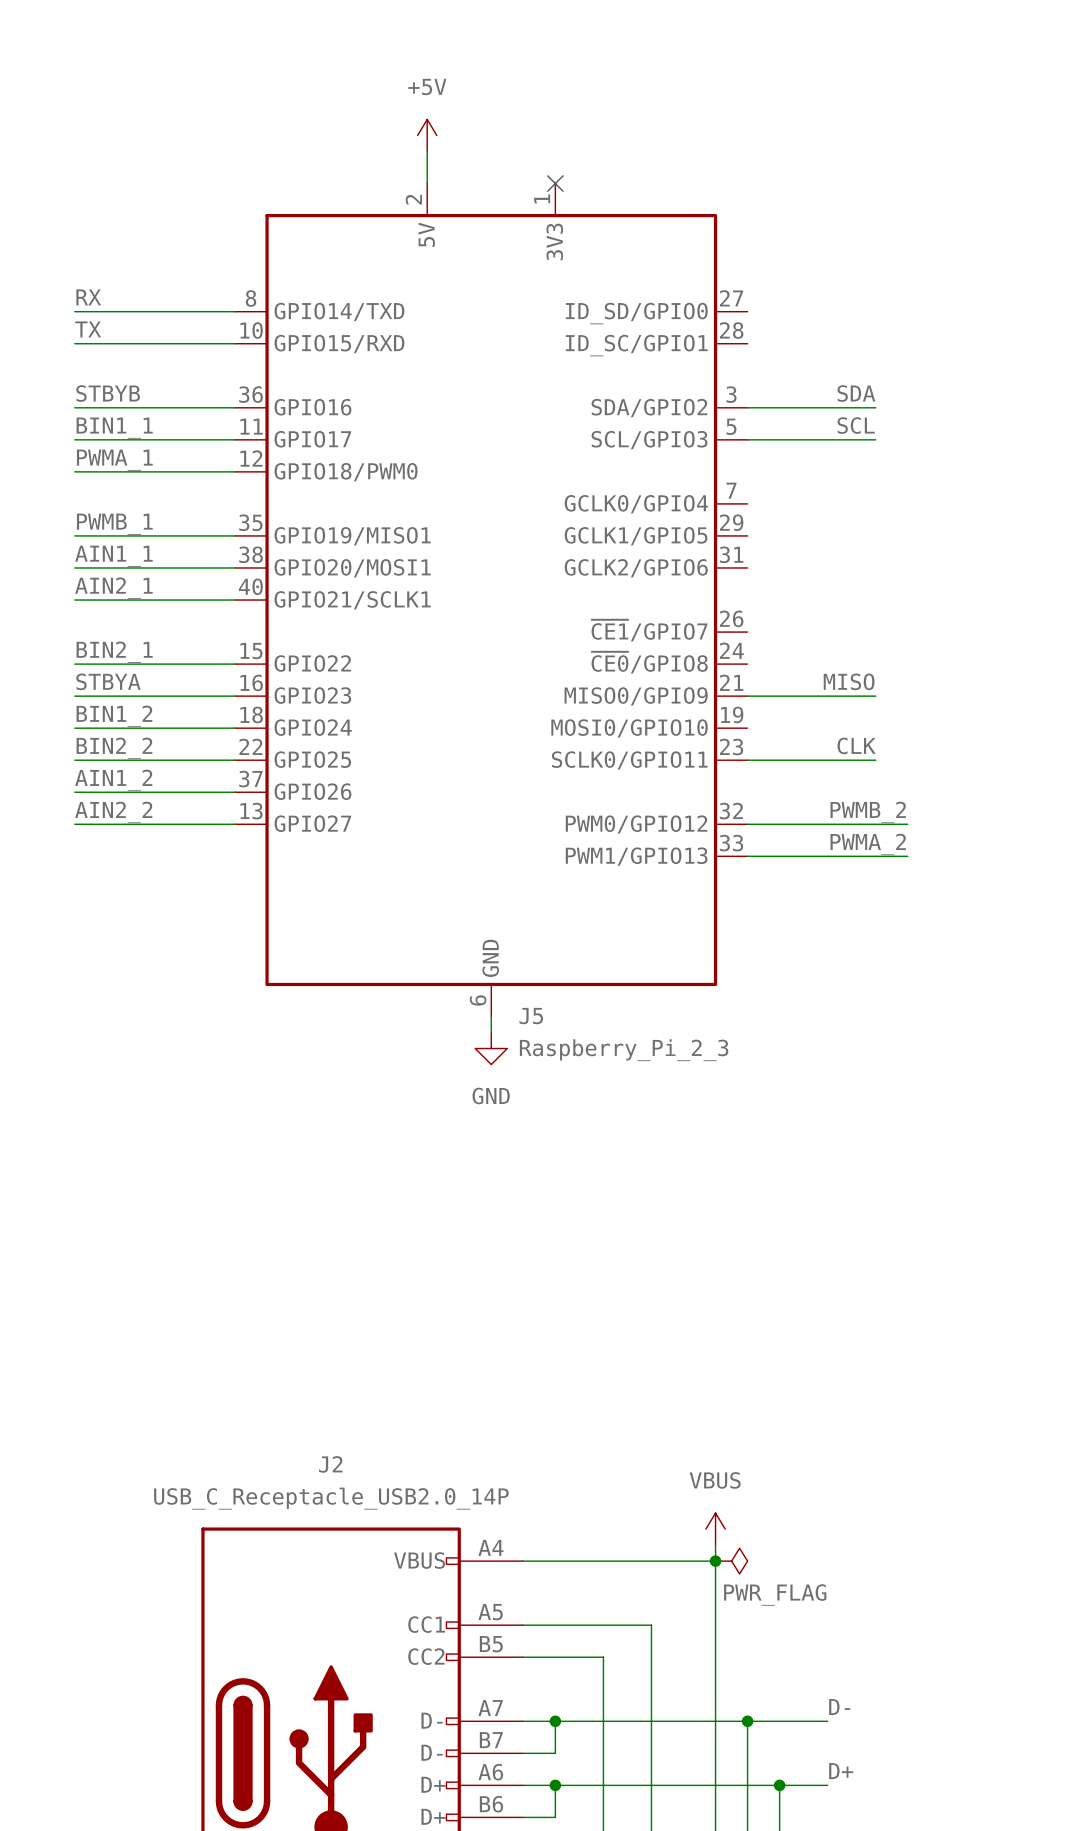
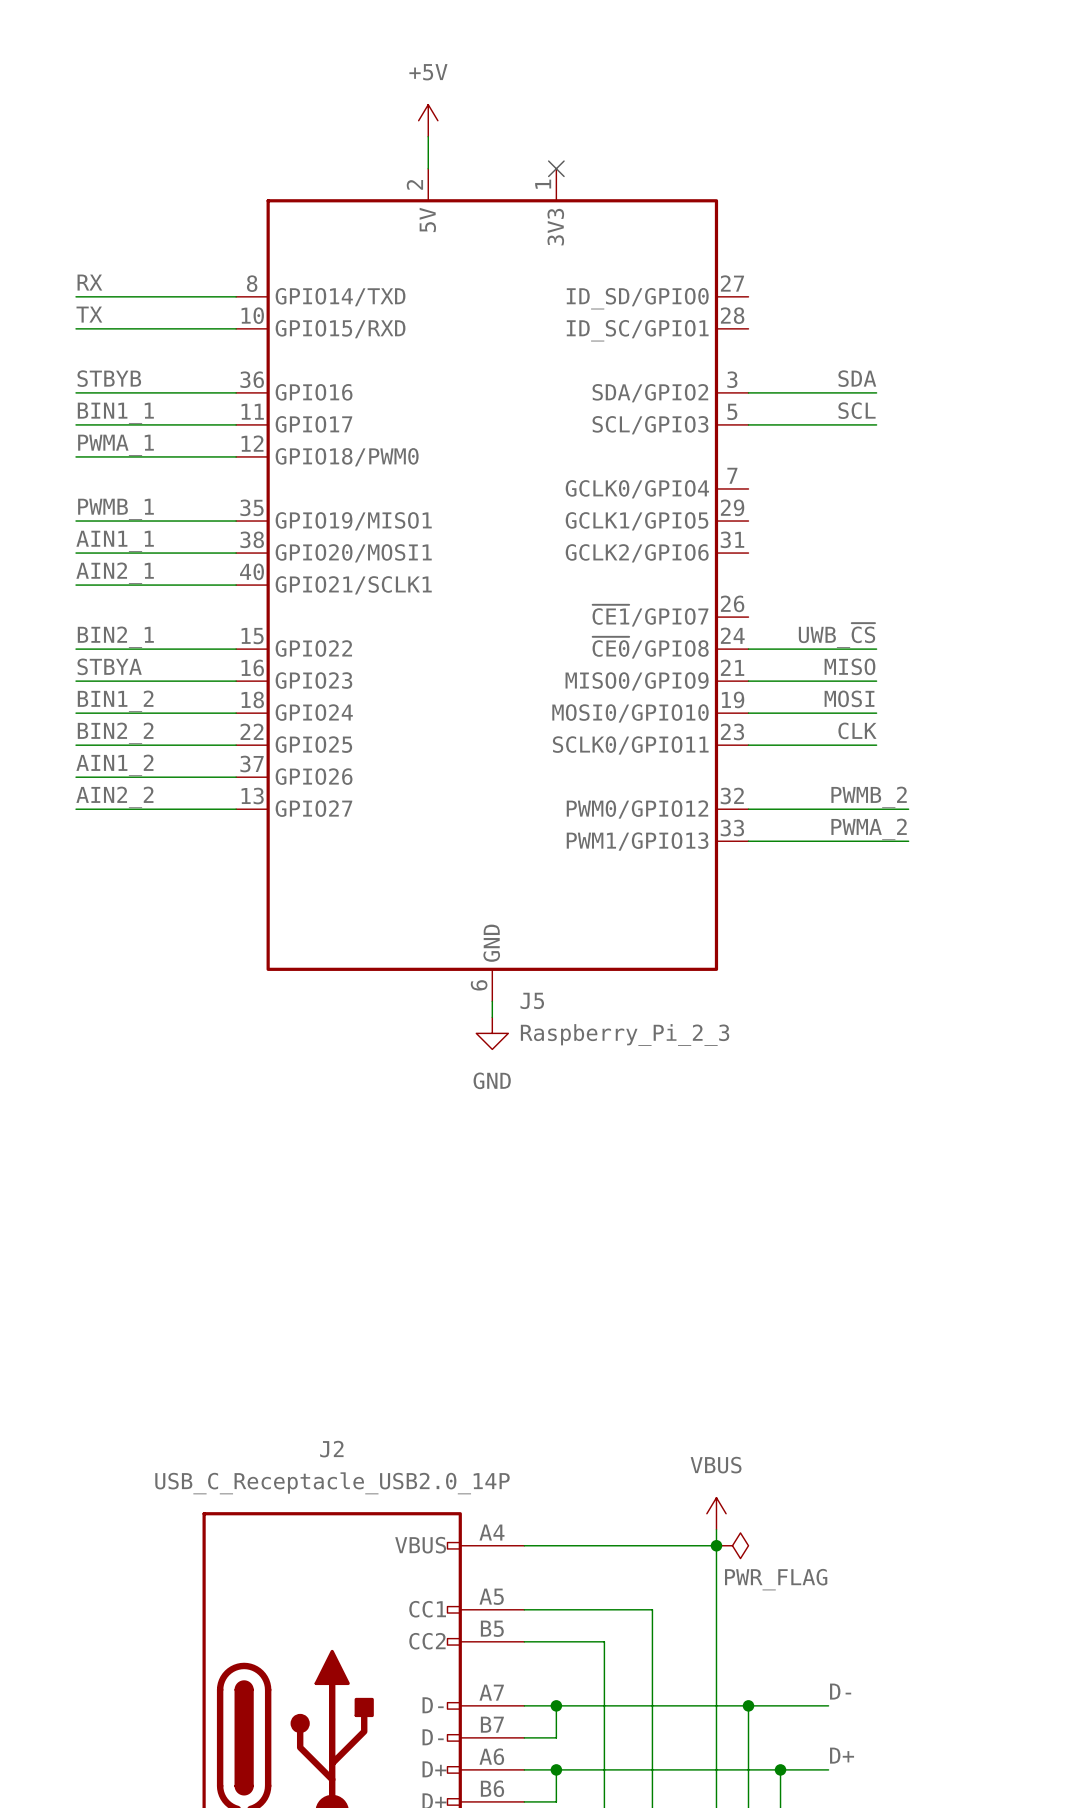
label: none -> UWB_~{CS} (836, 635)
wire: none -> (748, 649) (876, 649)
label: none -> MOSI (849, 698)
wire: none -> (748, 713) (876, 713)

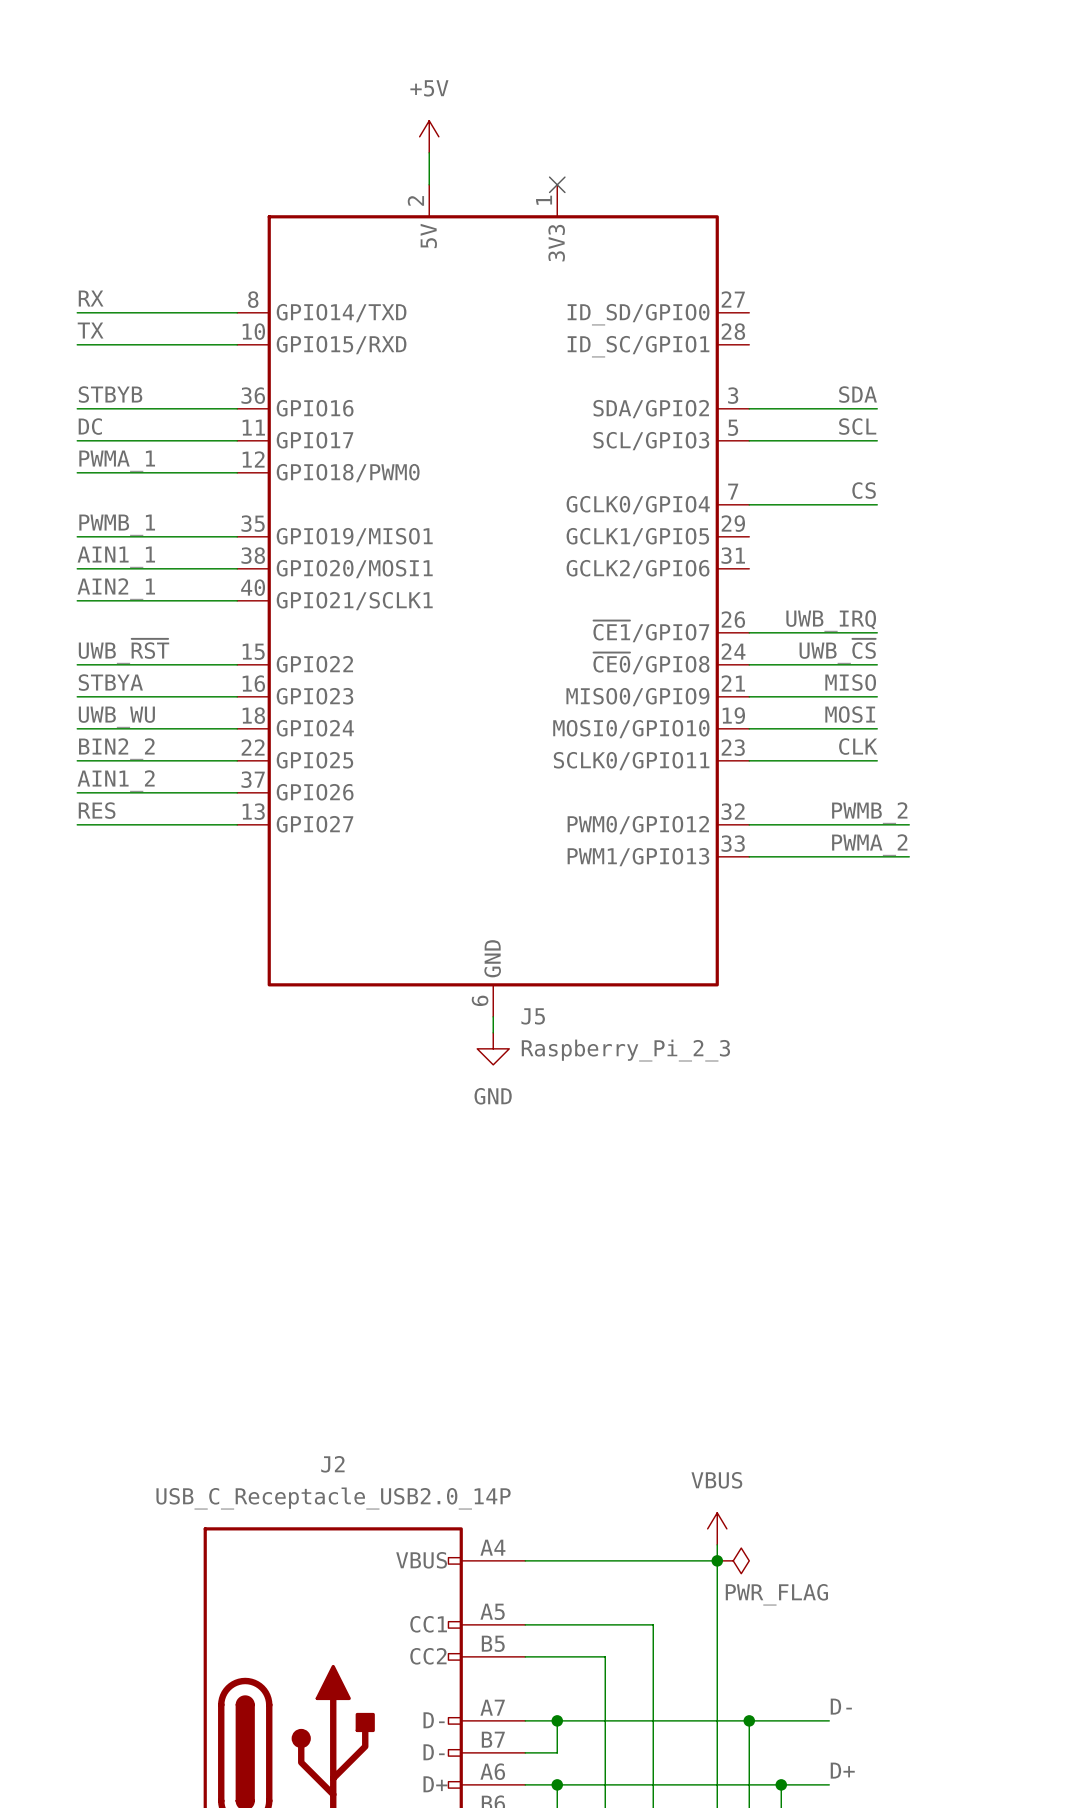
label: BIN1_1 (115, 413) -> DC (90, 426)
label: none -> CS (864, 490)
wire: none -> (749, 504) (877, 504)
label: none -> UWB_IRQ (831, 620)
wire: none -> (749, 632) (877, 632)
label: BIN2_1 (115, 637) -> UWB_~{RST} (124, 651)
label: BIN1_2 (115, 701) -> UWB_WU (116, 717)
label: AIN2_2 (114, 797) -> RES (97, 810)

